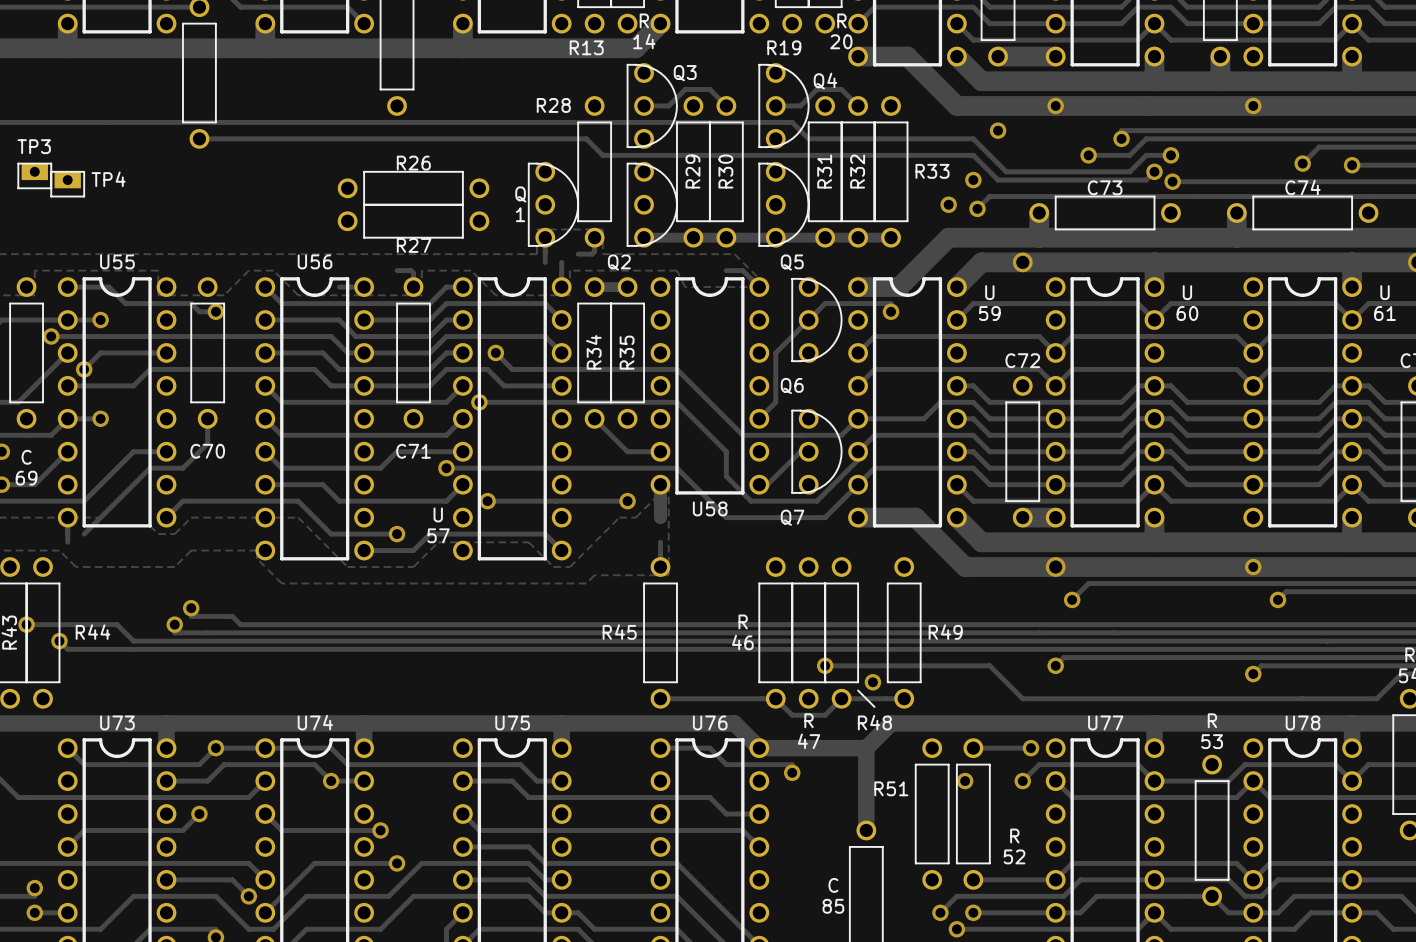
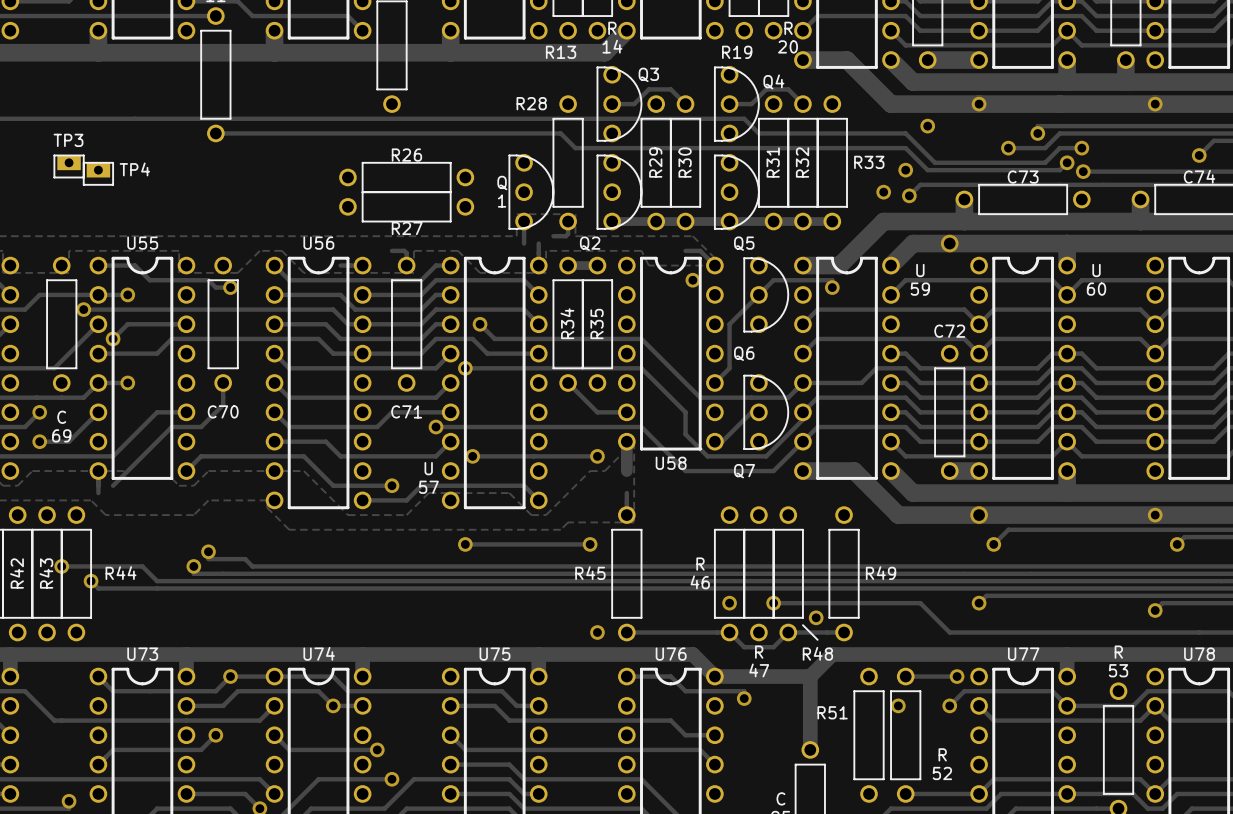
via: none -> (692, 280)
track: none -> (465, 544) (590, 544)
via: none -> (465, 544)
via: none -> (590, 544)
via: none -> (729, 603)
via: none -> (597, 632)

